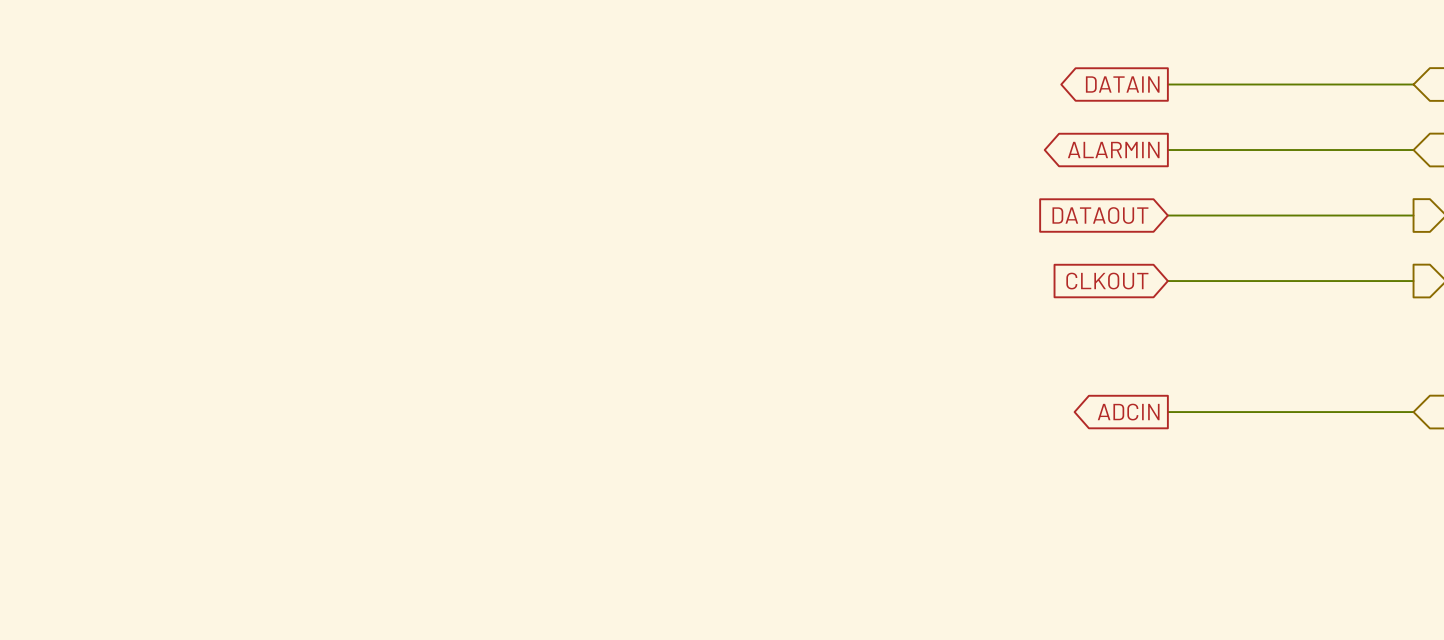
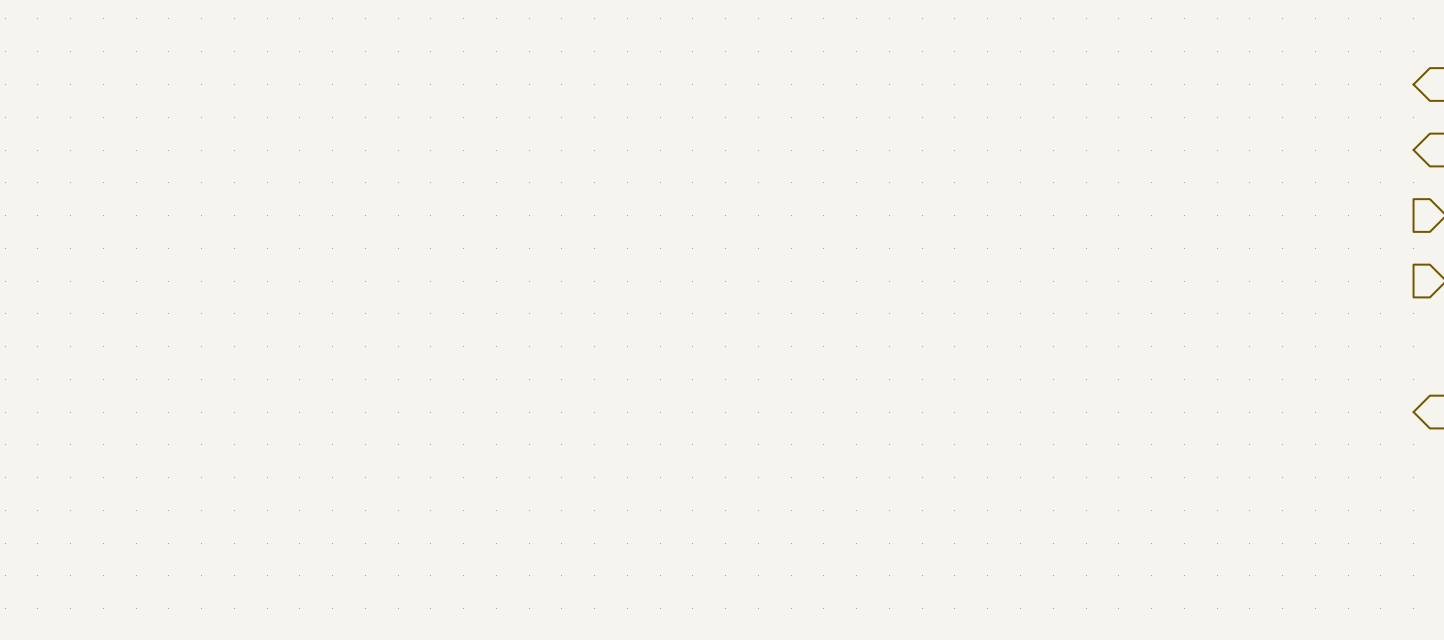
global label: DATAIN (1122, 84) -> none
wire: (1167, 84) (1413, 84) -> none
global label: ALARMIN (1113, 150) -> none
wire: (1167, 150) (1413, 150) -> none
global label: DATAOUT (1100, 215) -> none
wire: (1167, 215) (1413, 215) -> none
global label: CLKOUT (1107, 281) -> none
wire: (1167, 281) (1413, 281) -> none
global label: ADCIN (1128, 412) -> none
wire: (1167, 412) (1413, 412) -> none

